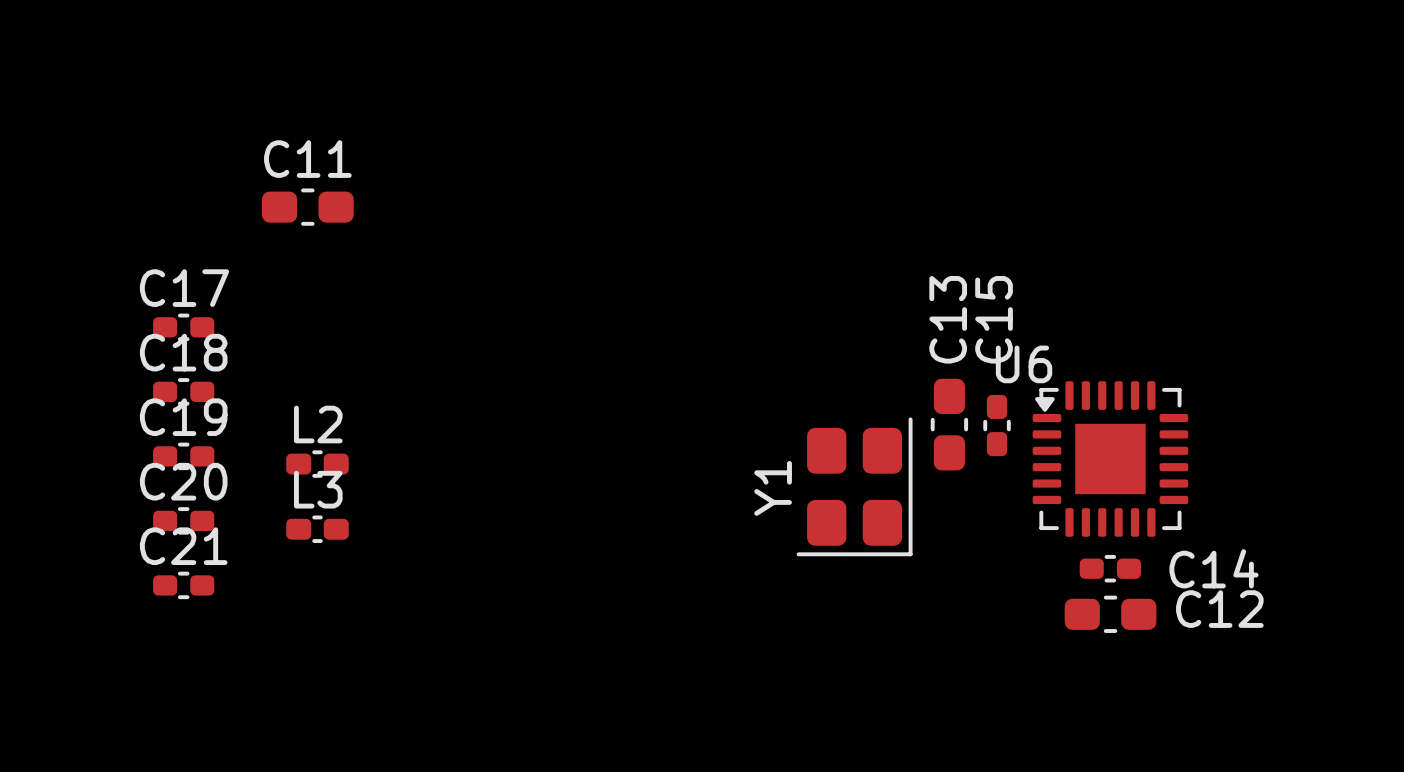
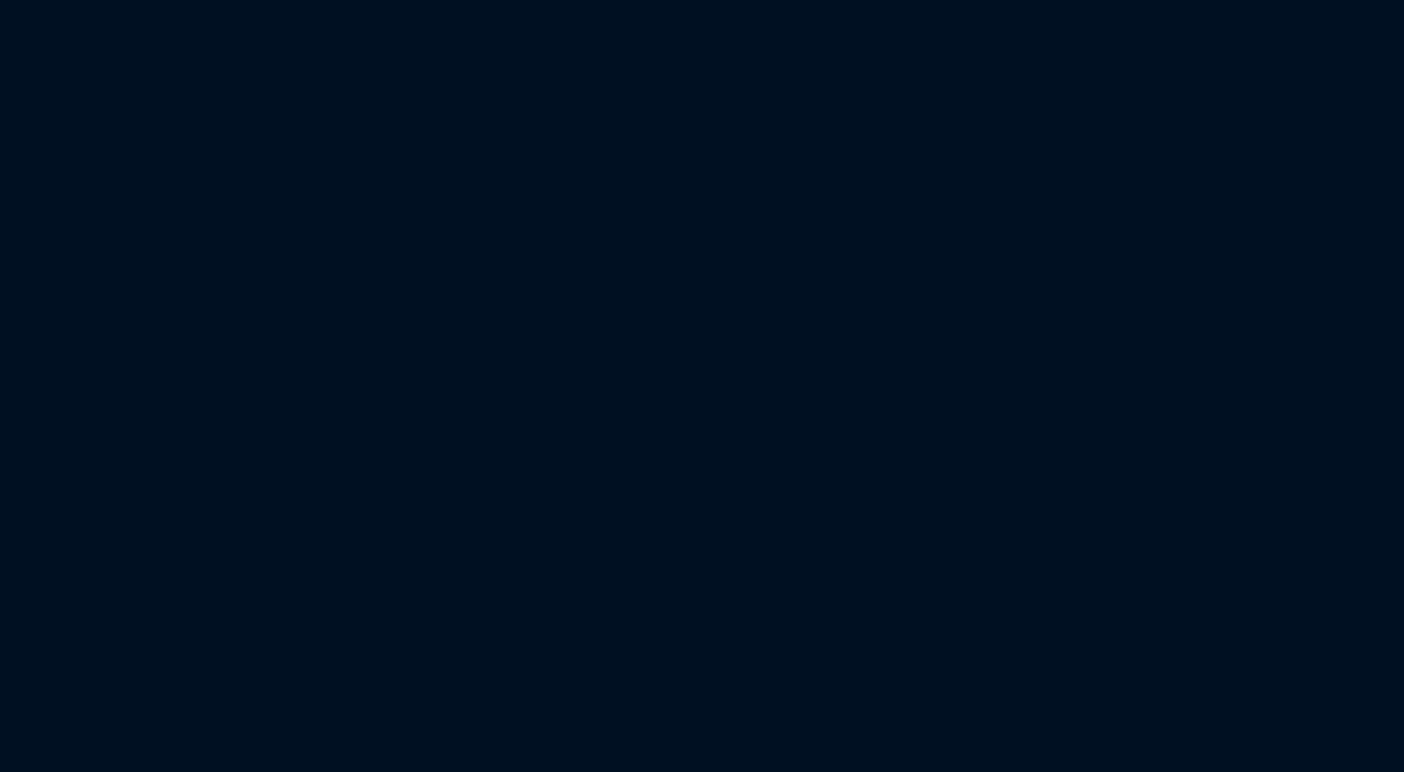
C11: (307, 207) -> none
C17: (183, 327) -> none
C18: (183, 391) -> none
C13: (949, 424) -> none
C15: (997, 425) -> none
C19: (183, 456) -> none
U6: (1110, 458) -> none
L2: (317, 464) -> none
Y1: (854, 486) -> none
C20: (183, 520) -> none
L3: (317, 529) -> none
C14: (1110, 568) -> none
C21: (183, 585) -> none
C12: (1110, 614) -> none

